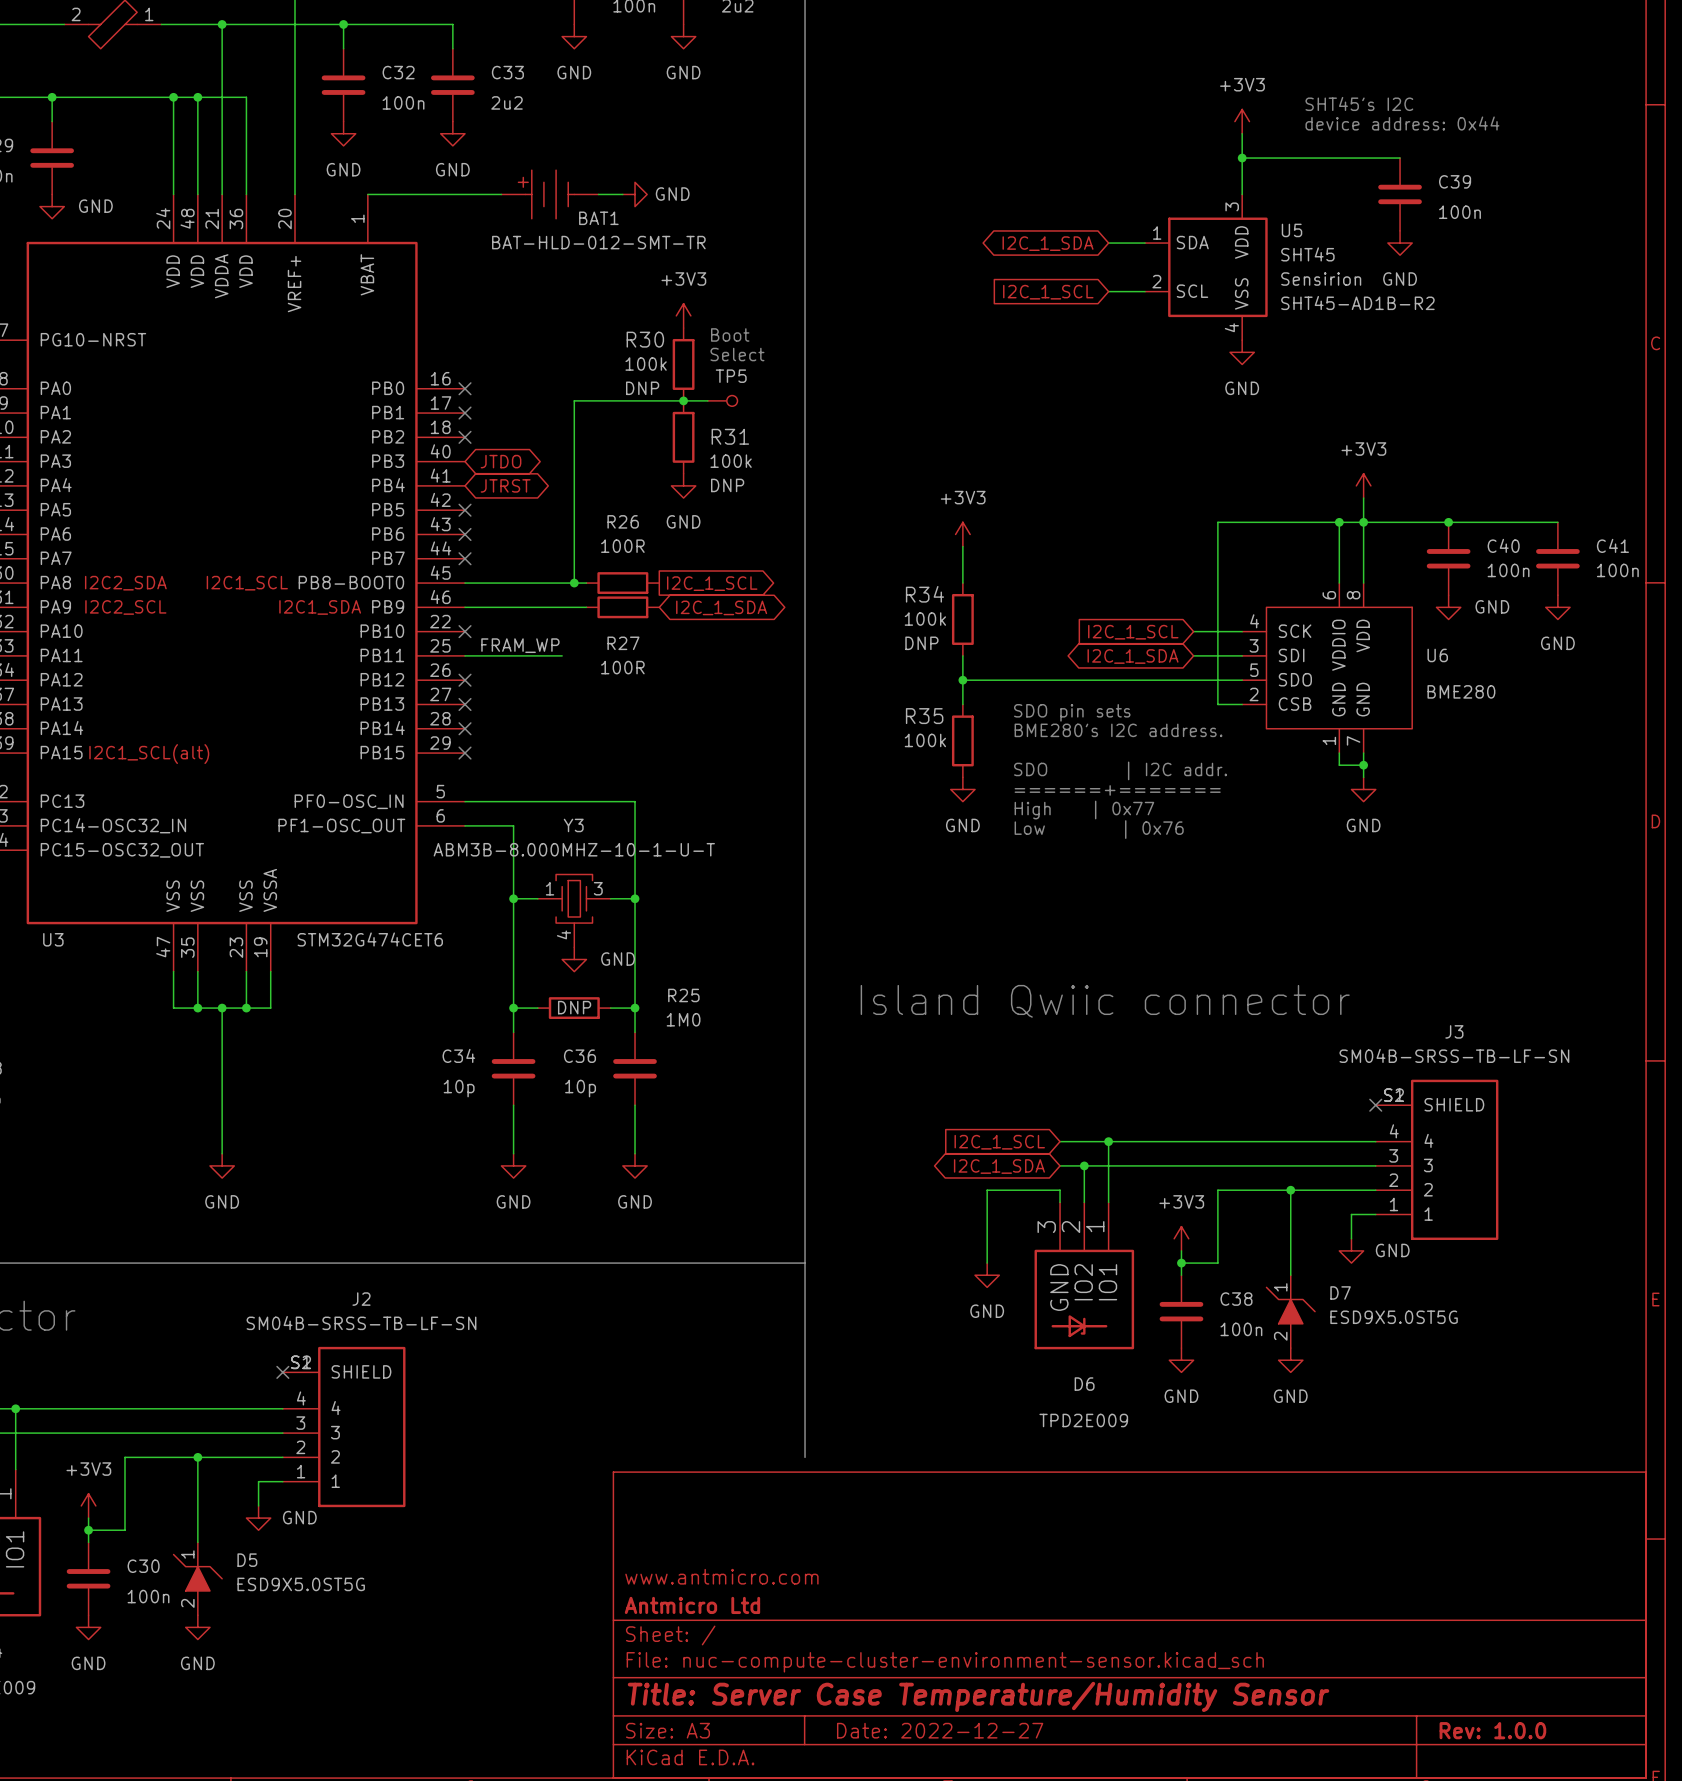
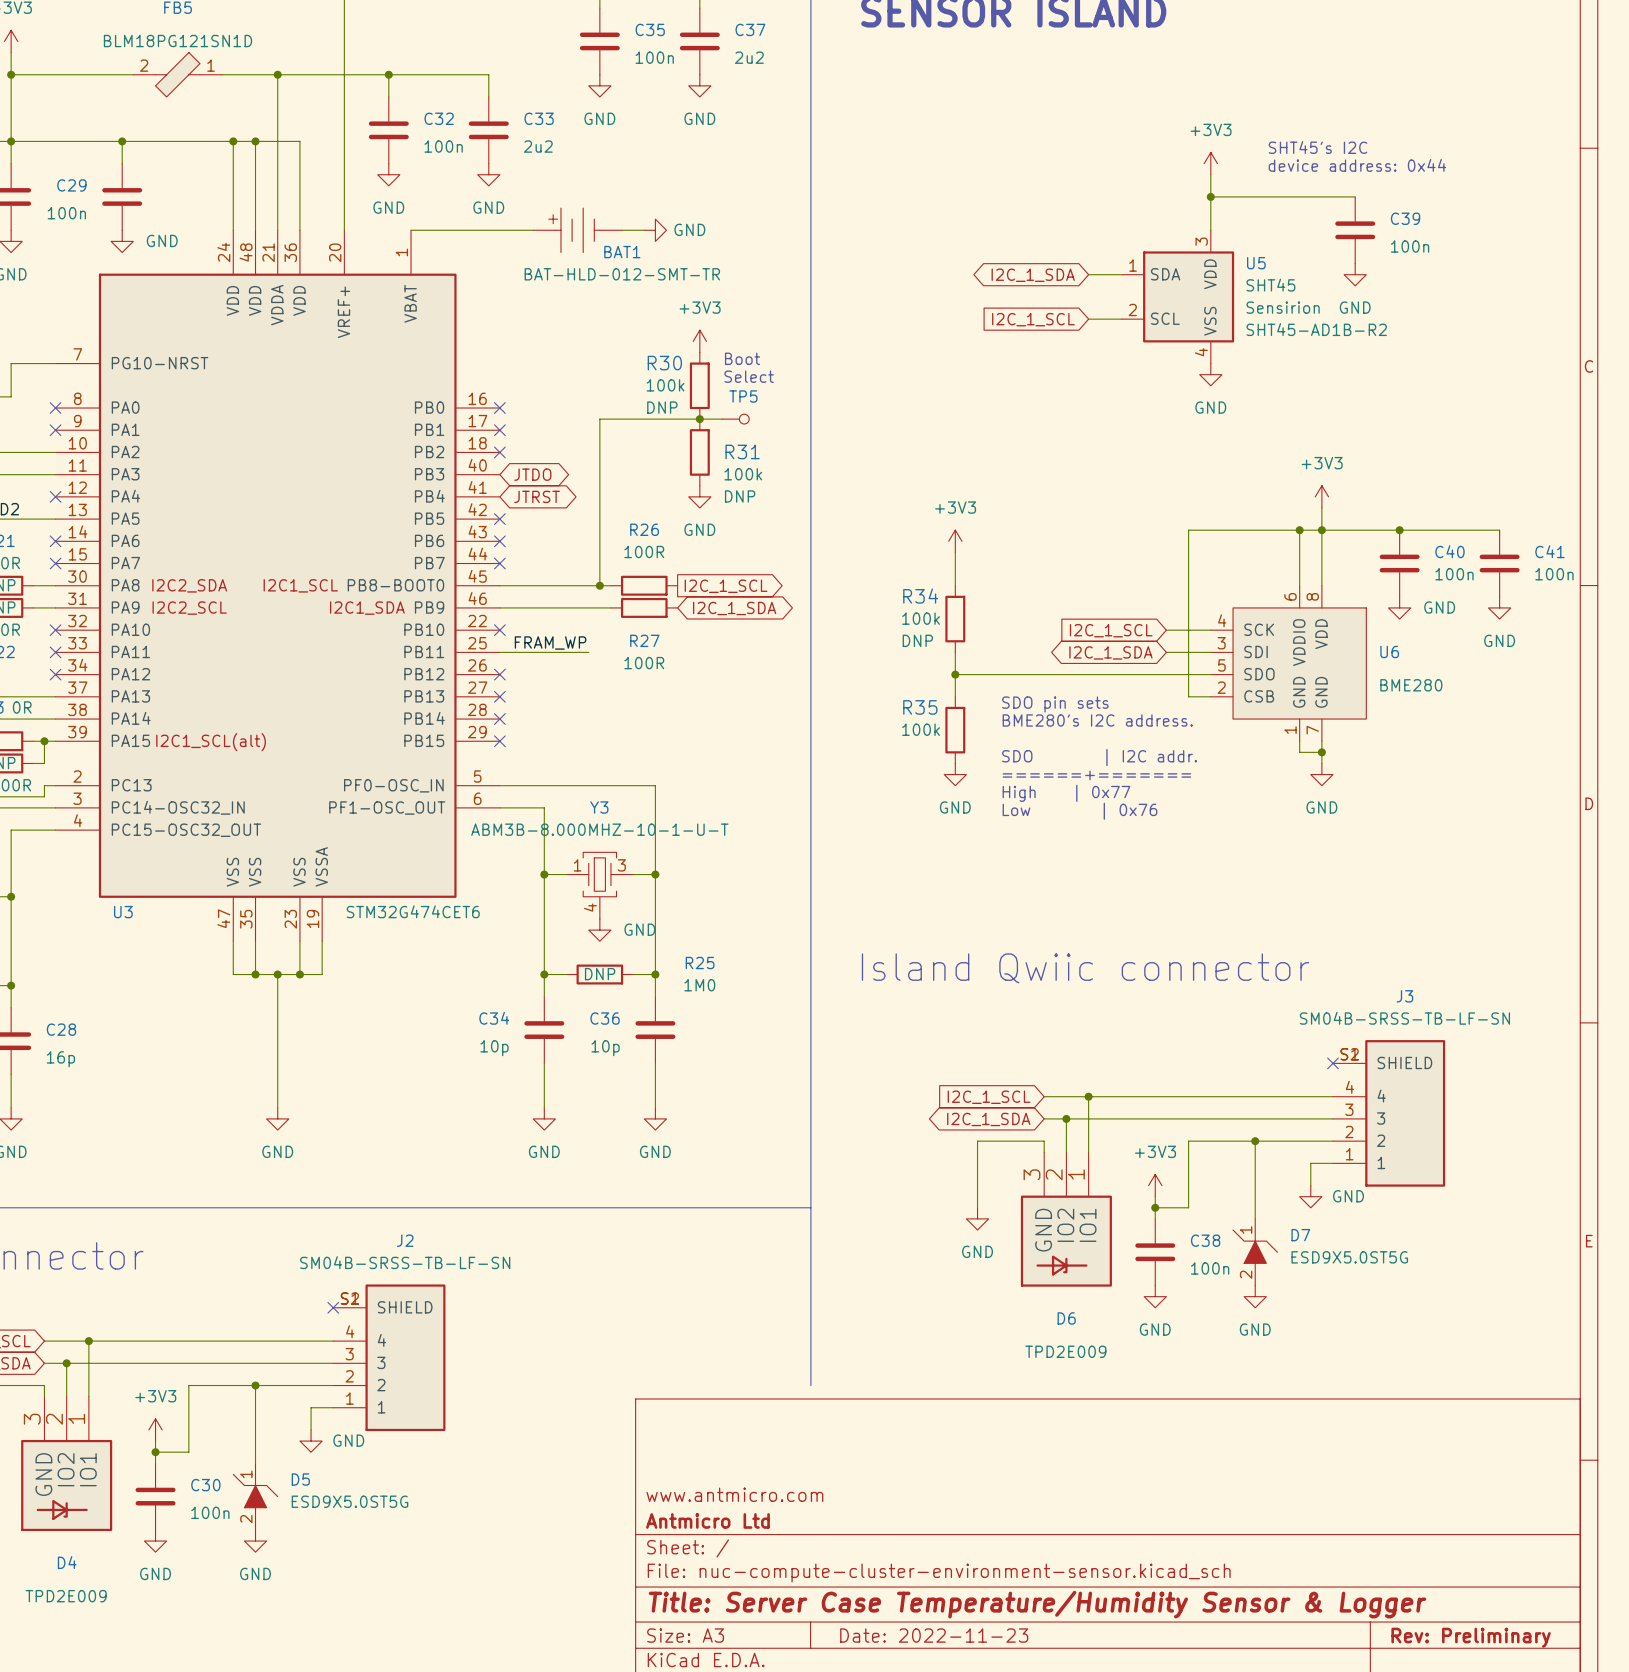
title block: Title: Server Case Temperature/Humidity Sensor (978, 1696) -> Title: Server Case Temperature/Humidity Sensor & Logger (1037, 1604)
title block: Date: 2022-12-27 (940, 1730) -> Date: 2022-11-23 (934, 1635)
title block: Rev: 1.0.0 (1492, 1730) -> Rev: Preliminary (1471, 1637)

